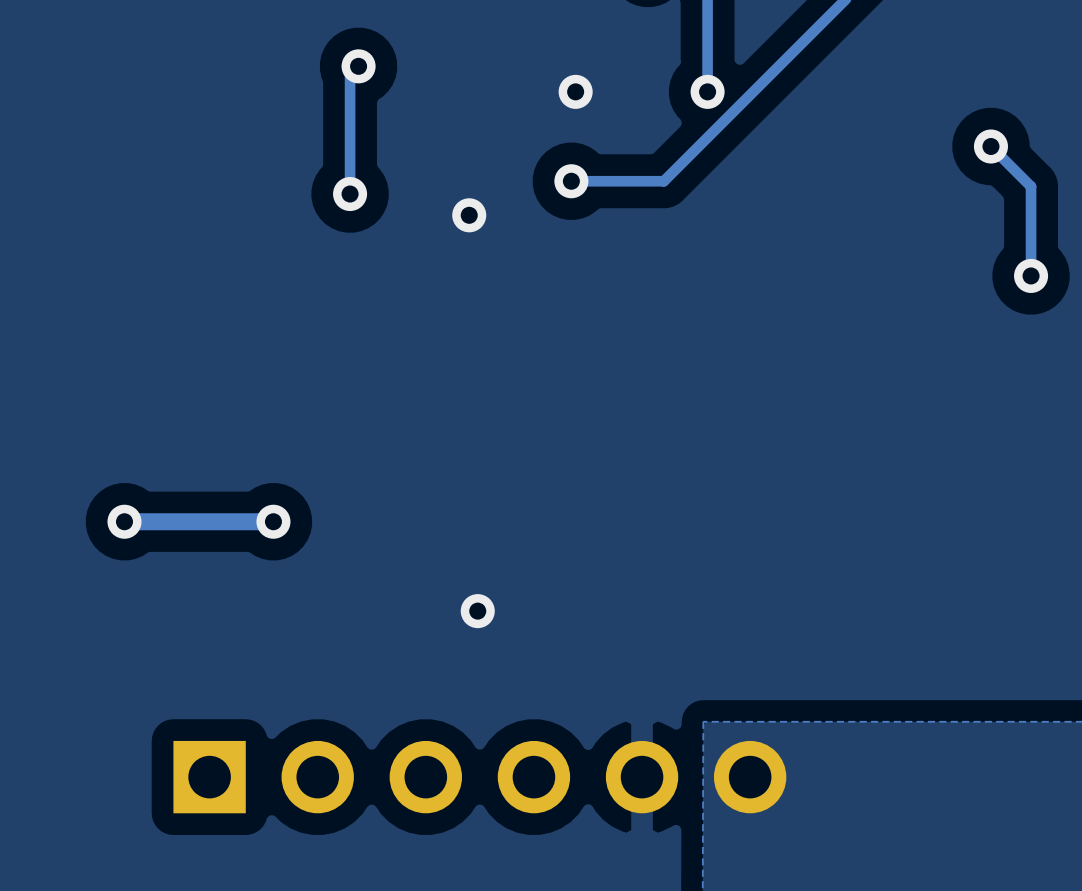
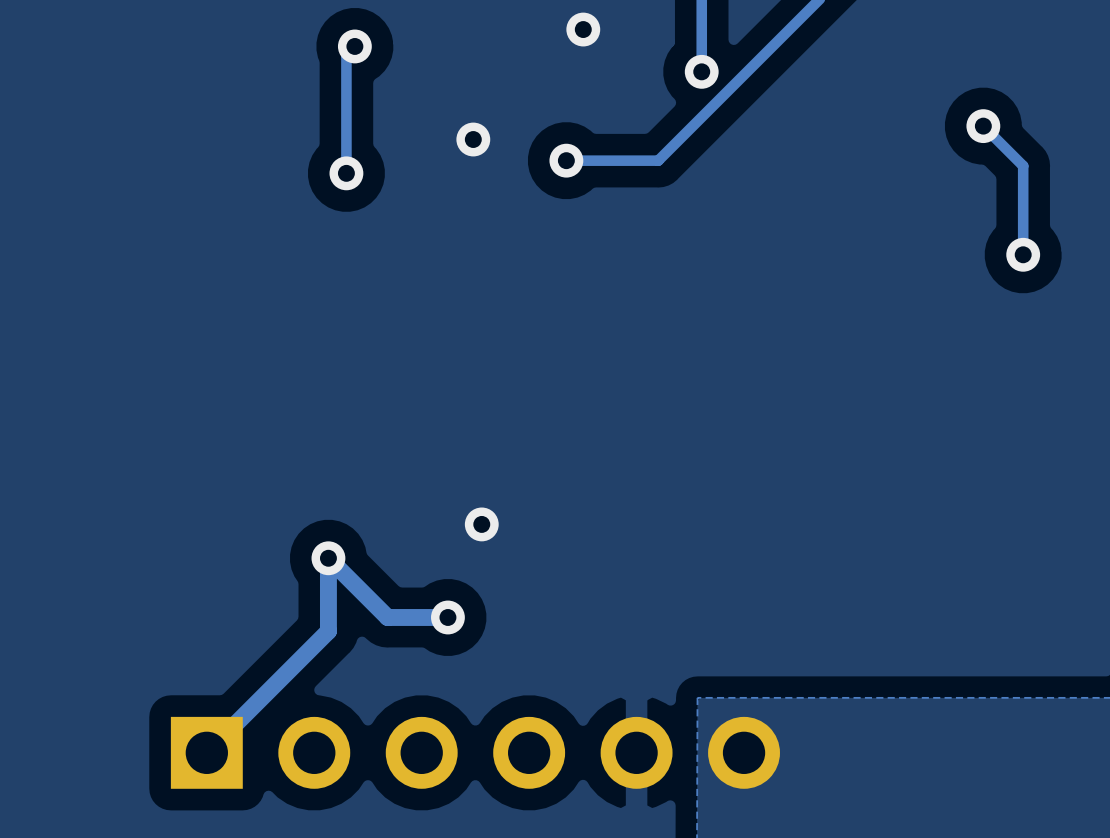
via position: (575, 91) -> (583, 29)
via position: (469, 215) -> (473, 139)
via: (124, 521) -> none
track: (273, 521) (124, 521) -> none
via: (273, 521) -> none
via: none -> (481, 524)
via: none -> (328, 558)
via position: (477, 611) -> (447, 617)
track: none -> (447, 617) (387, 617) (328, 558) (328, 631) (206, 752)

